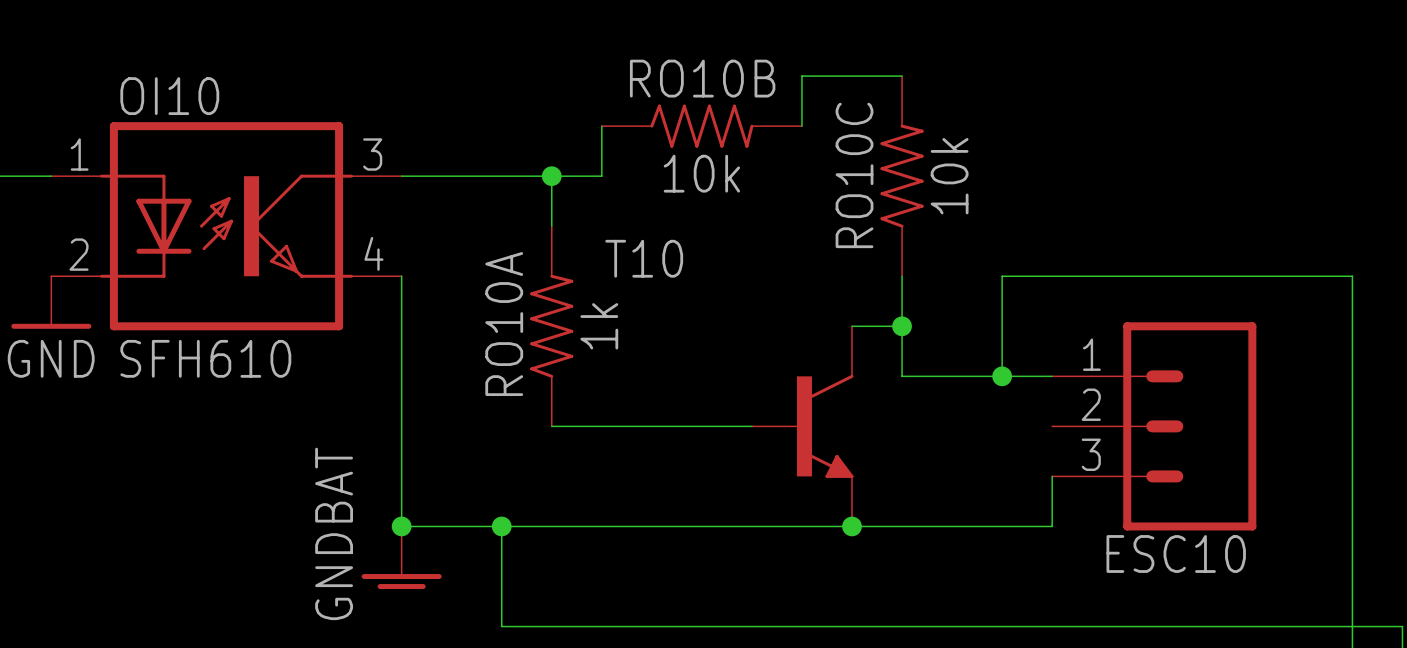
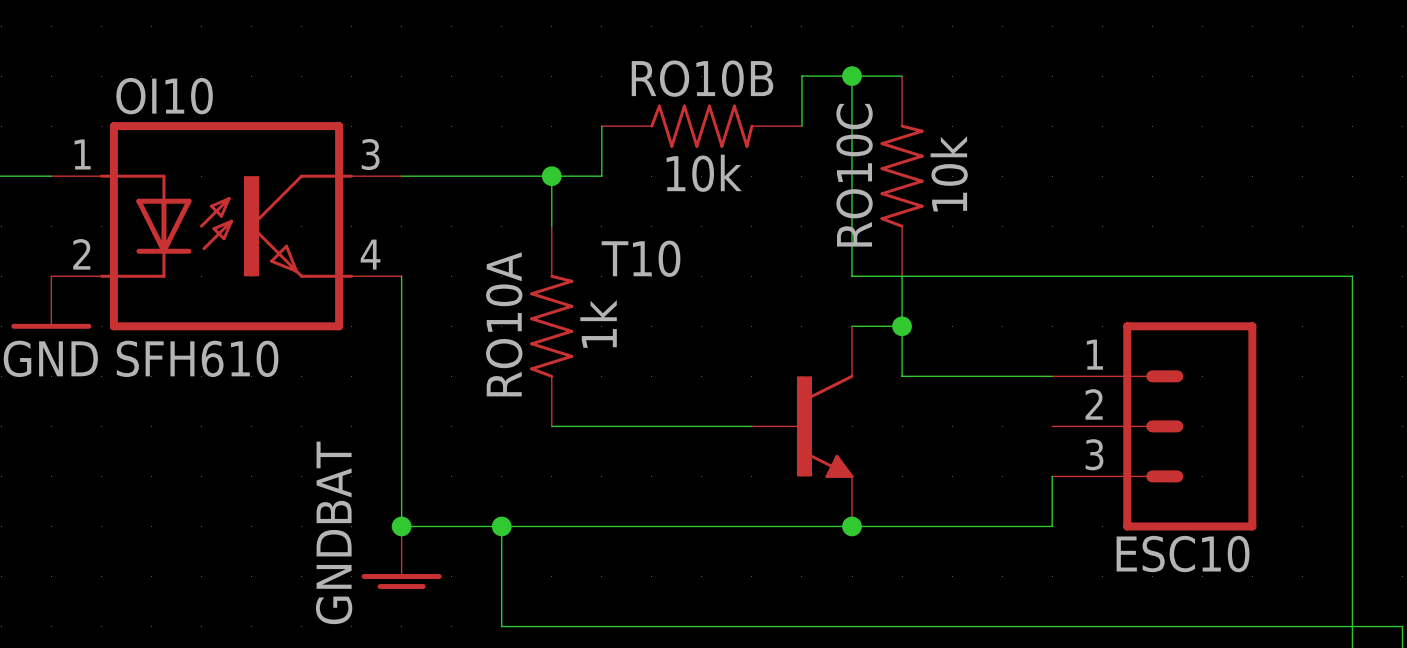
junction: none -> (852, 76)
wire: (1002, 276) (1002, 376) -> (1002, 276) (852, 276) (852, 76)
junction: (1002, 376) -> none

